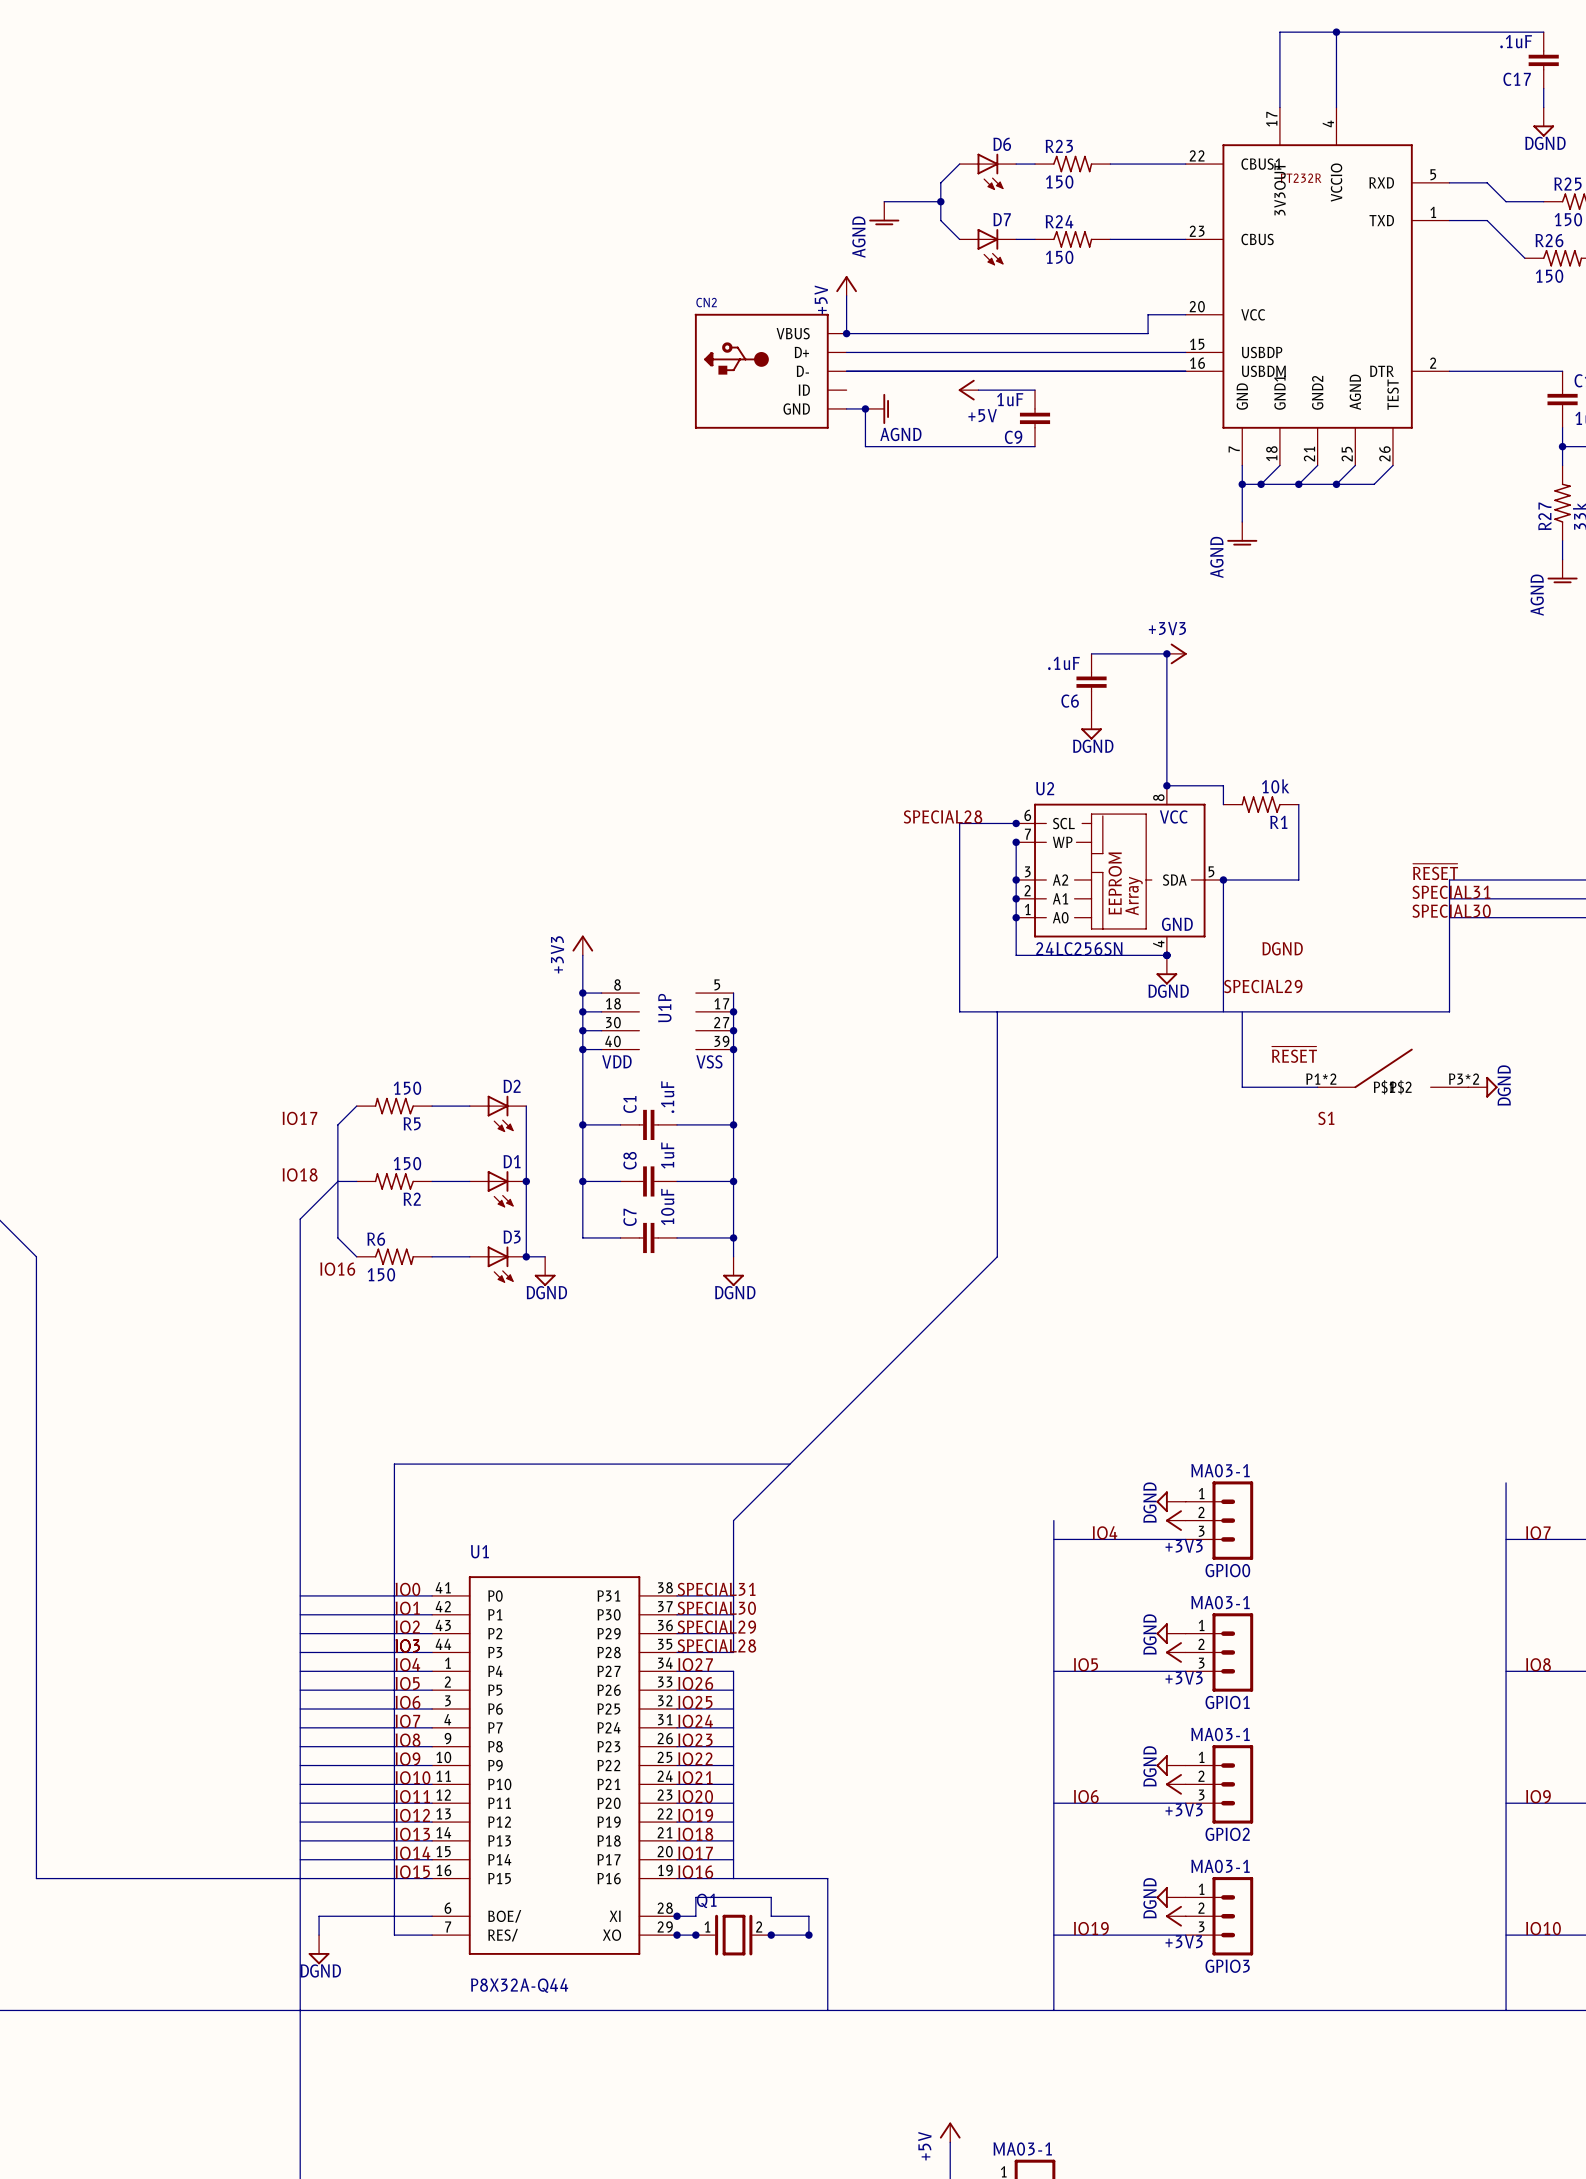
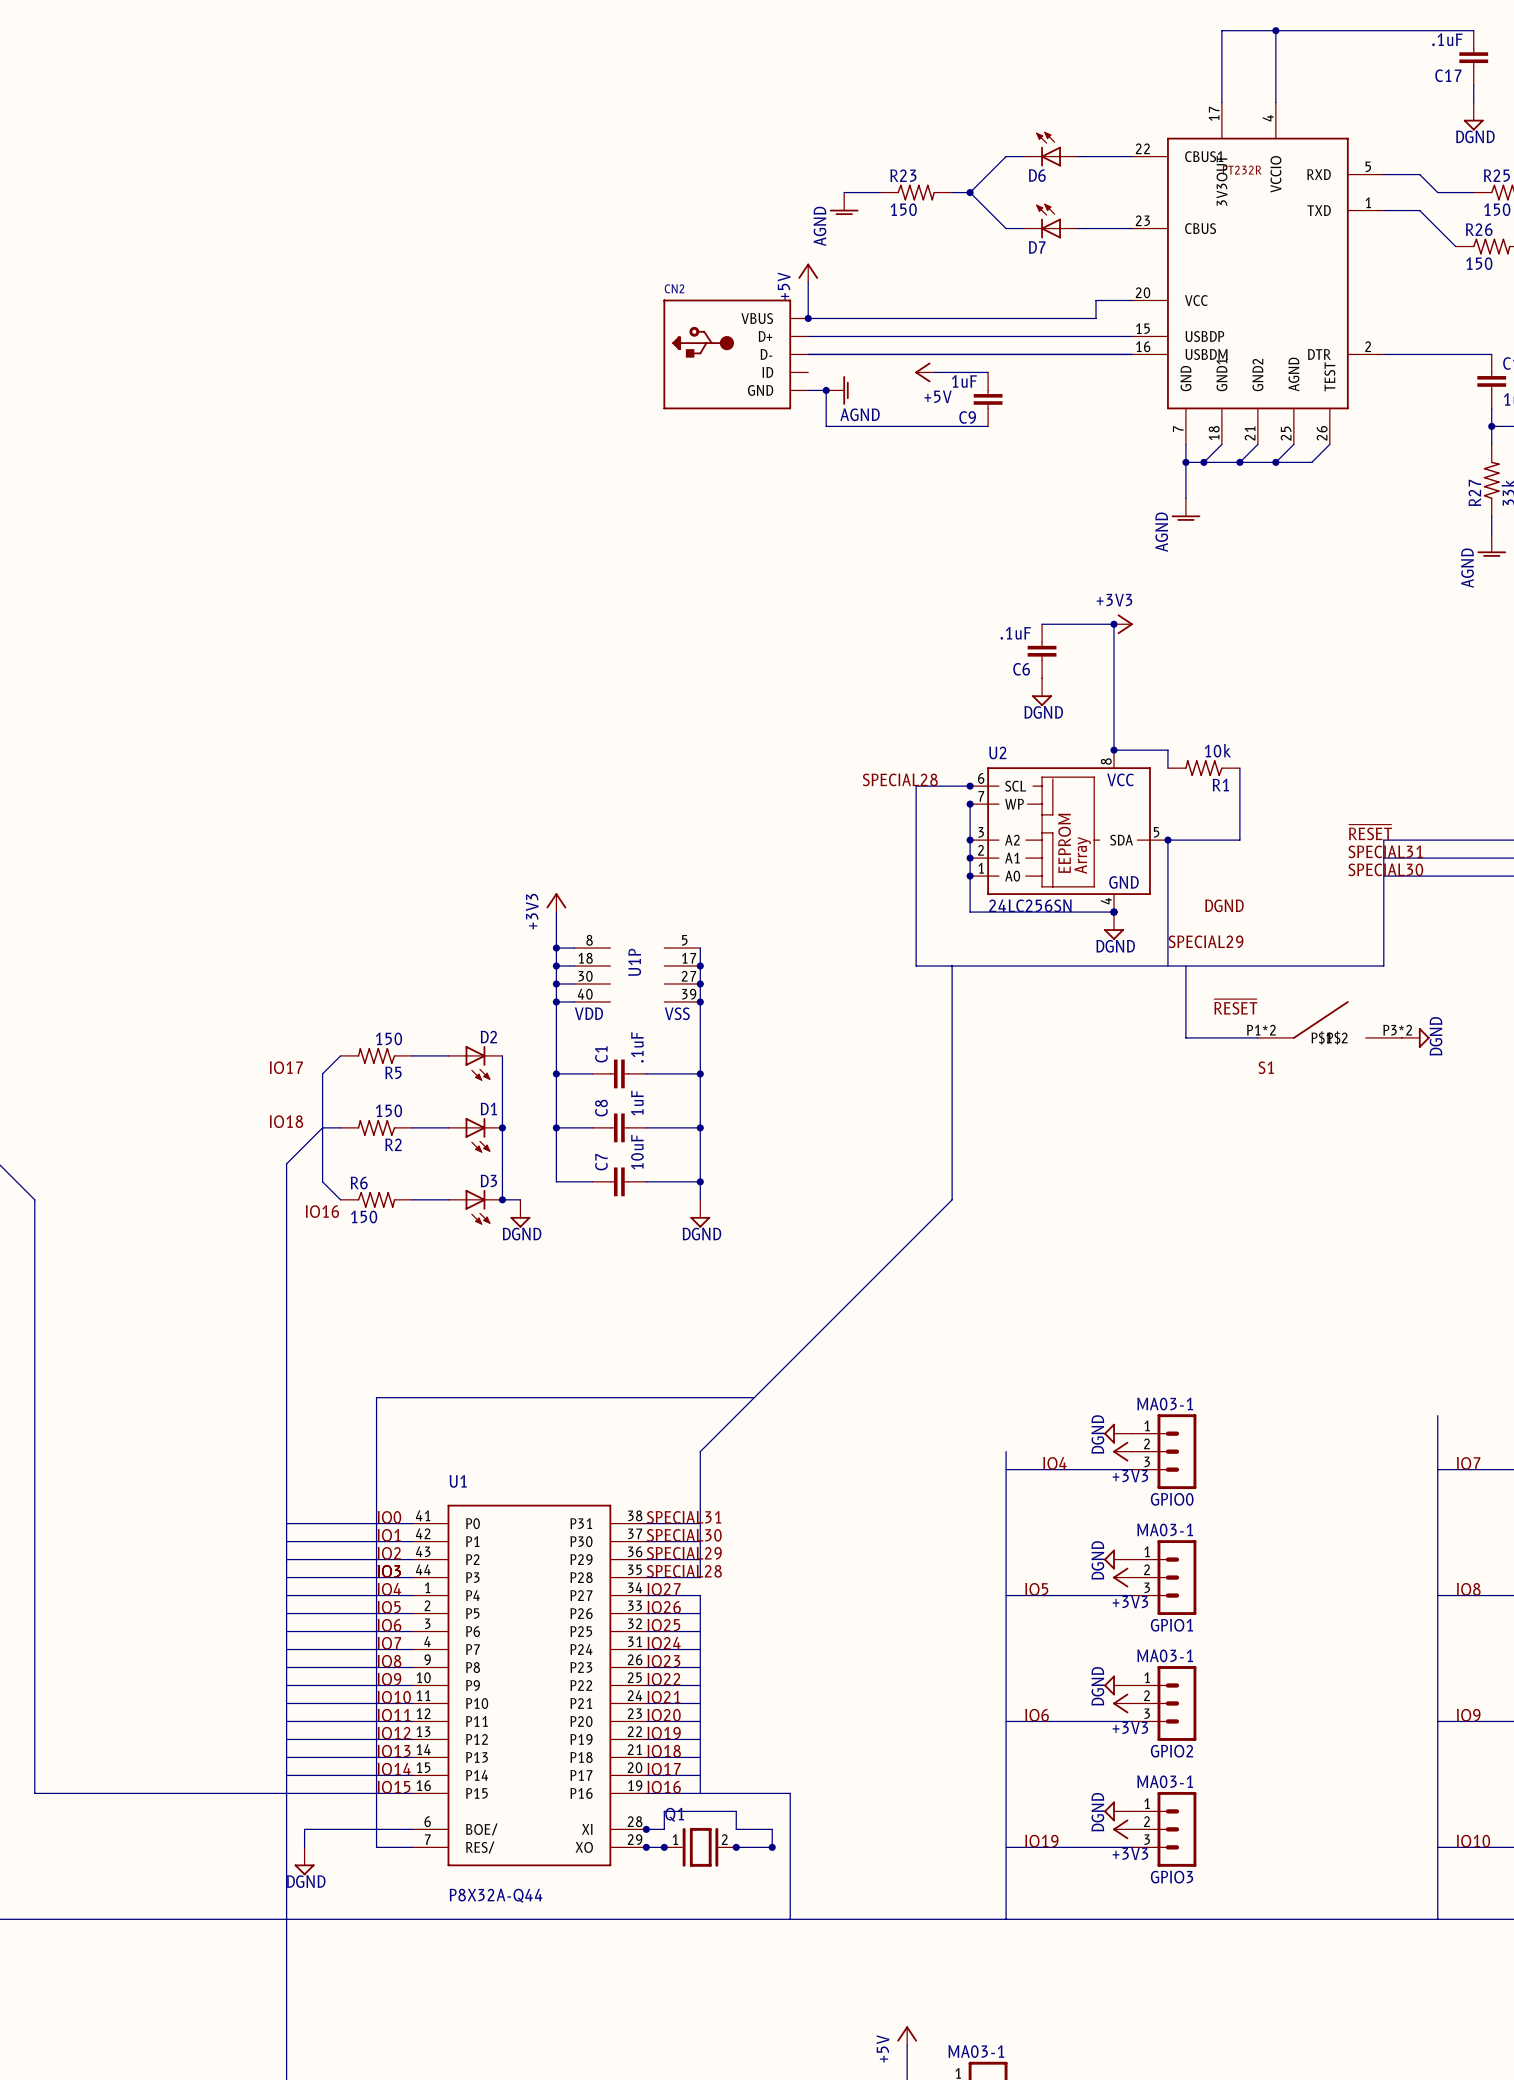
wire: (959, 164) (940, 182) (940, 220) (959, 239) -> none
wire: (1016, 164) (1035, 164) -> (952, 192) (970, 192)
wire: none -> (1024, 156) (1006, 156) (970, 192)
R23 position: (1072, 164) -> (916, 192)
D6 position: (987, 171) -> (1051, 149)
D6 rotation: 0° (990, 171) -> 180° (1048, 149)
junction: (940, 201) -> none
wire: none -> (970, 192) (1006, 228) (1024, 228)
junction: none -> (970, 192)
wire: (1016, 239) (1035, 239) -> none
R24: 150 (1072, 239) -> none
D7 position: (987, 247) -> (1051, 221)
D7 rotation: 0° (990, 247) -> 180° (1048, 221)

